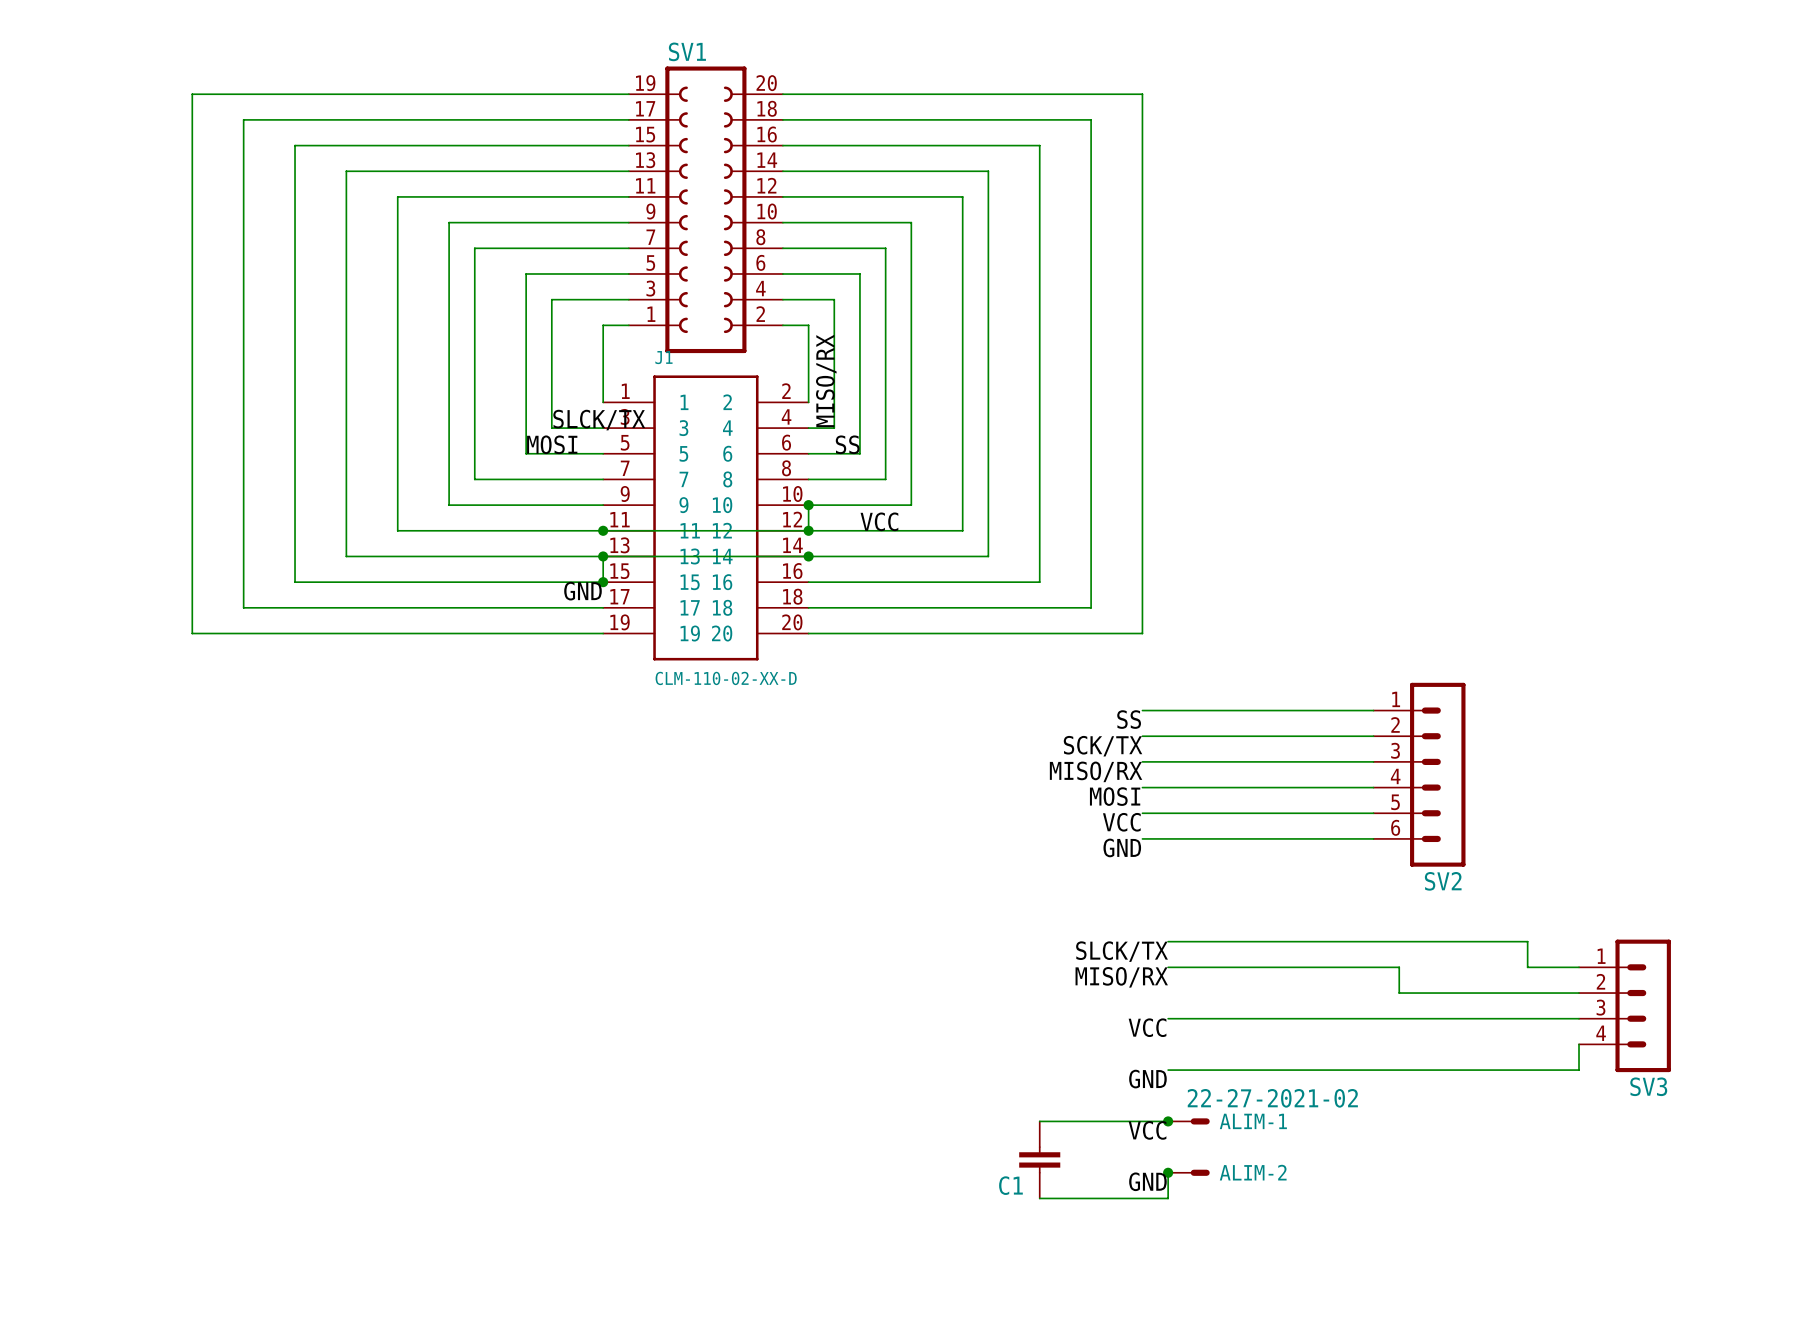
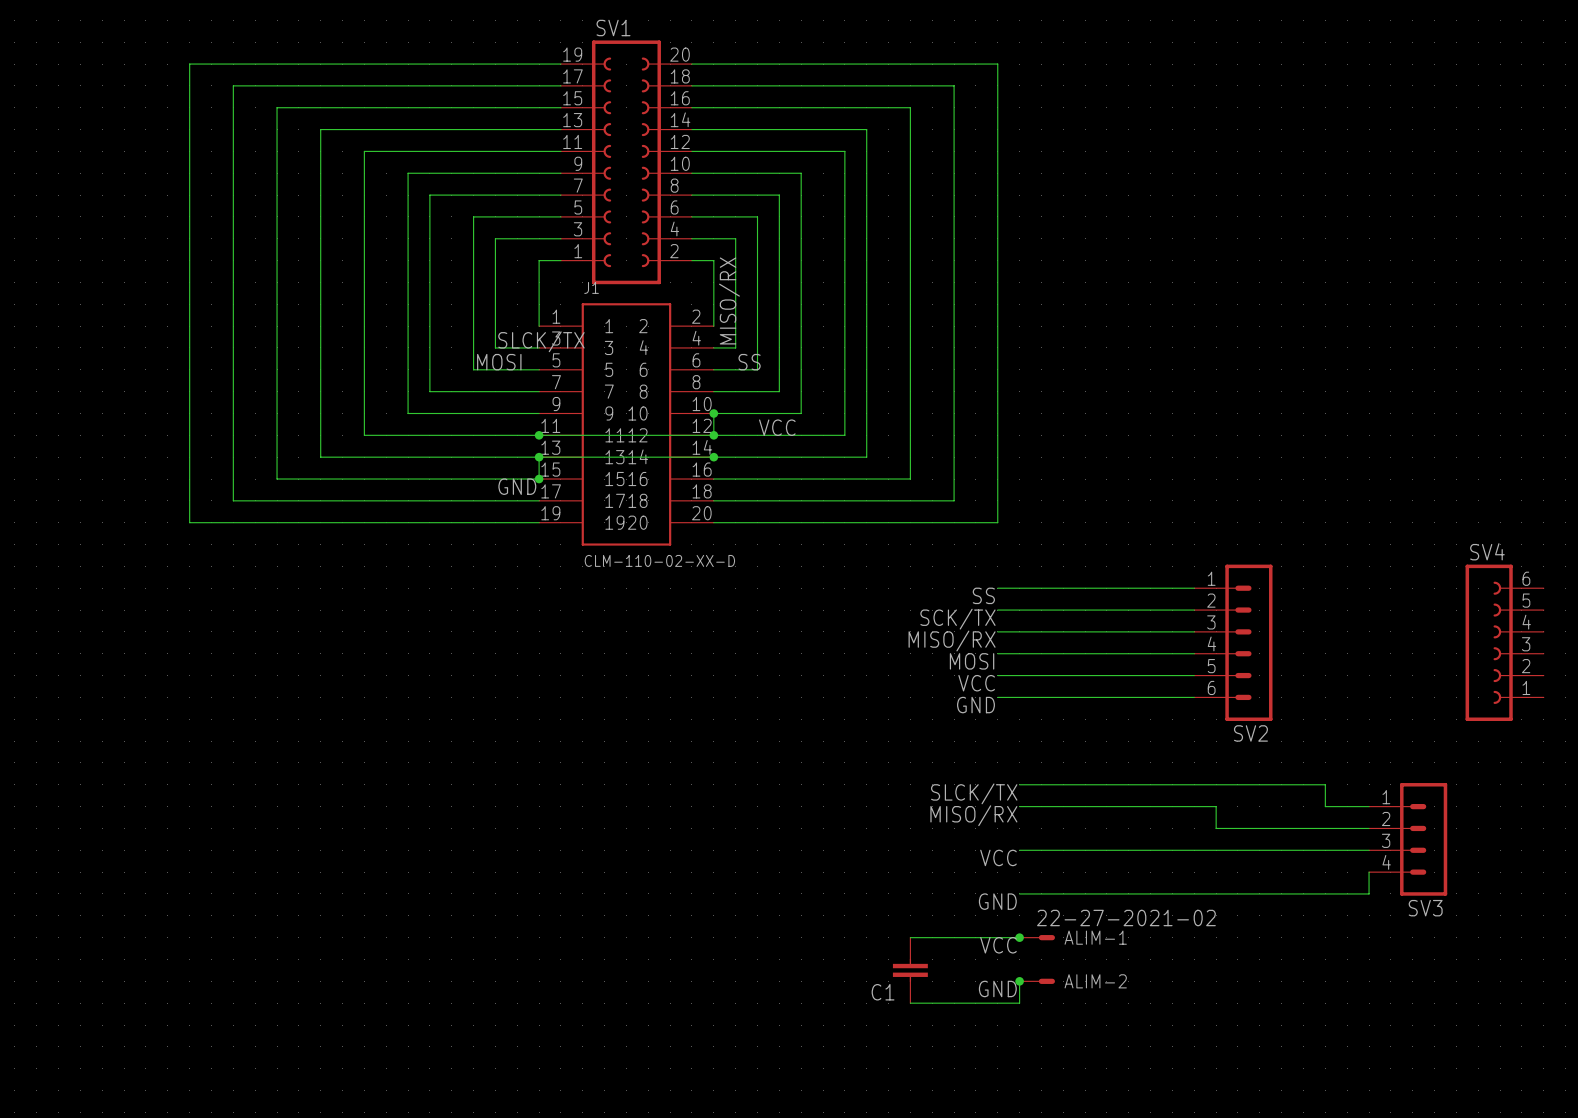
SV4: none -> (1504, 642)

